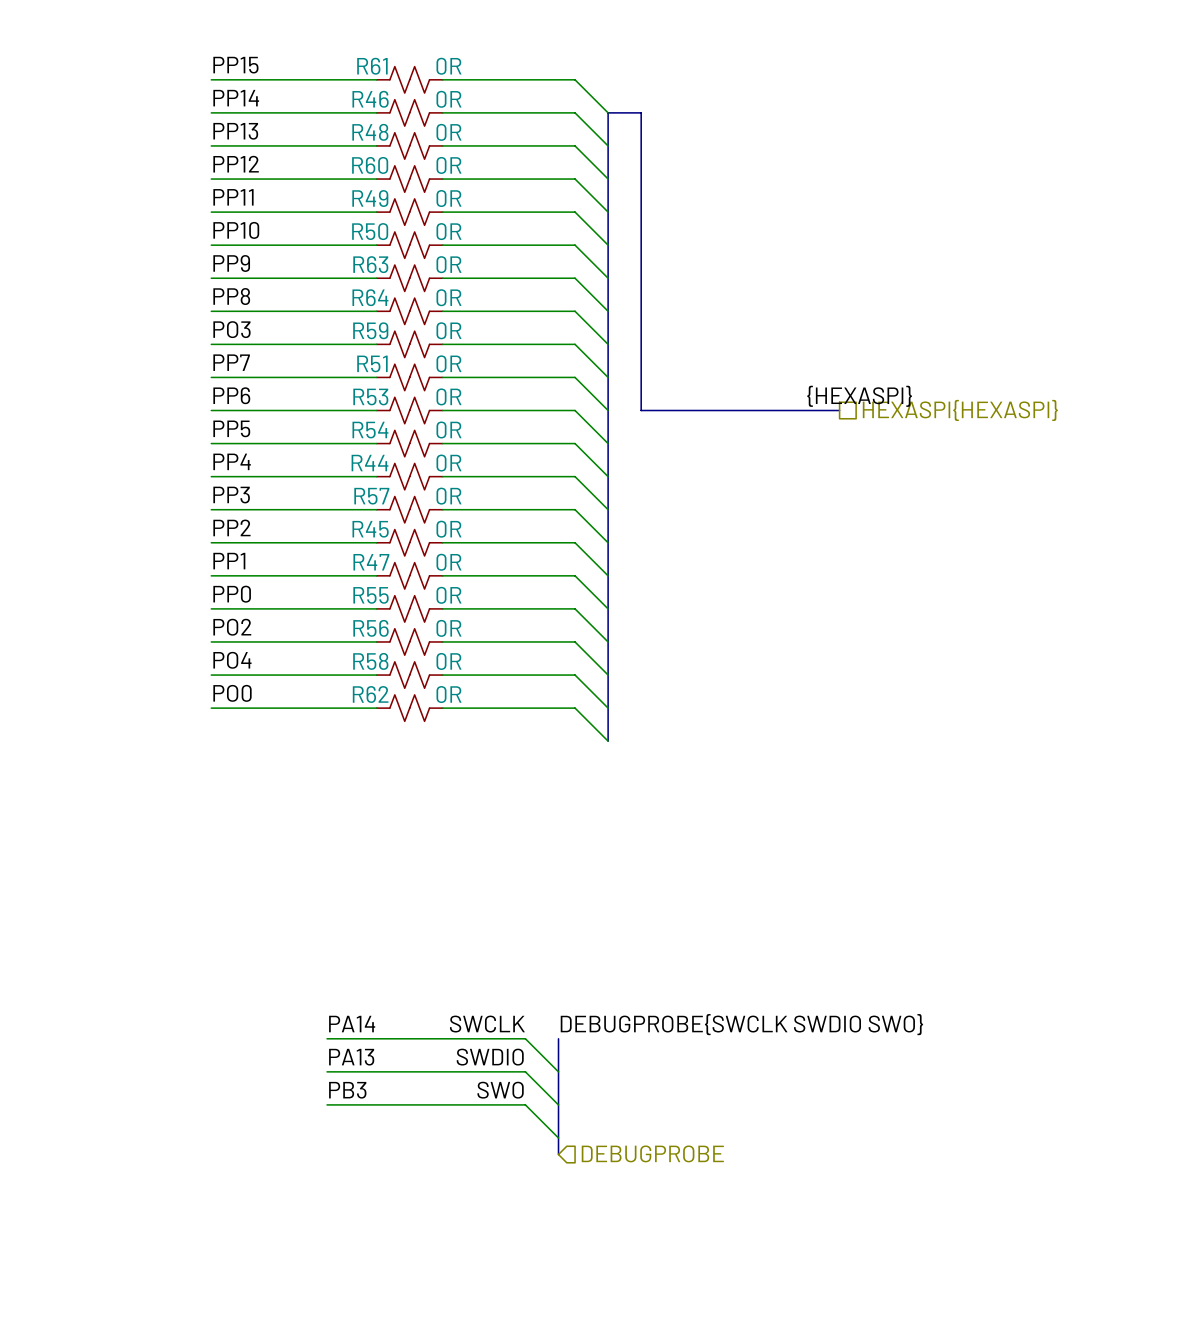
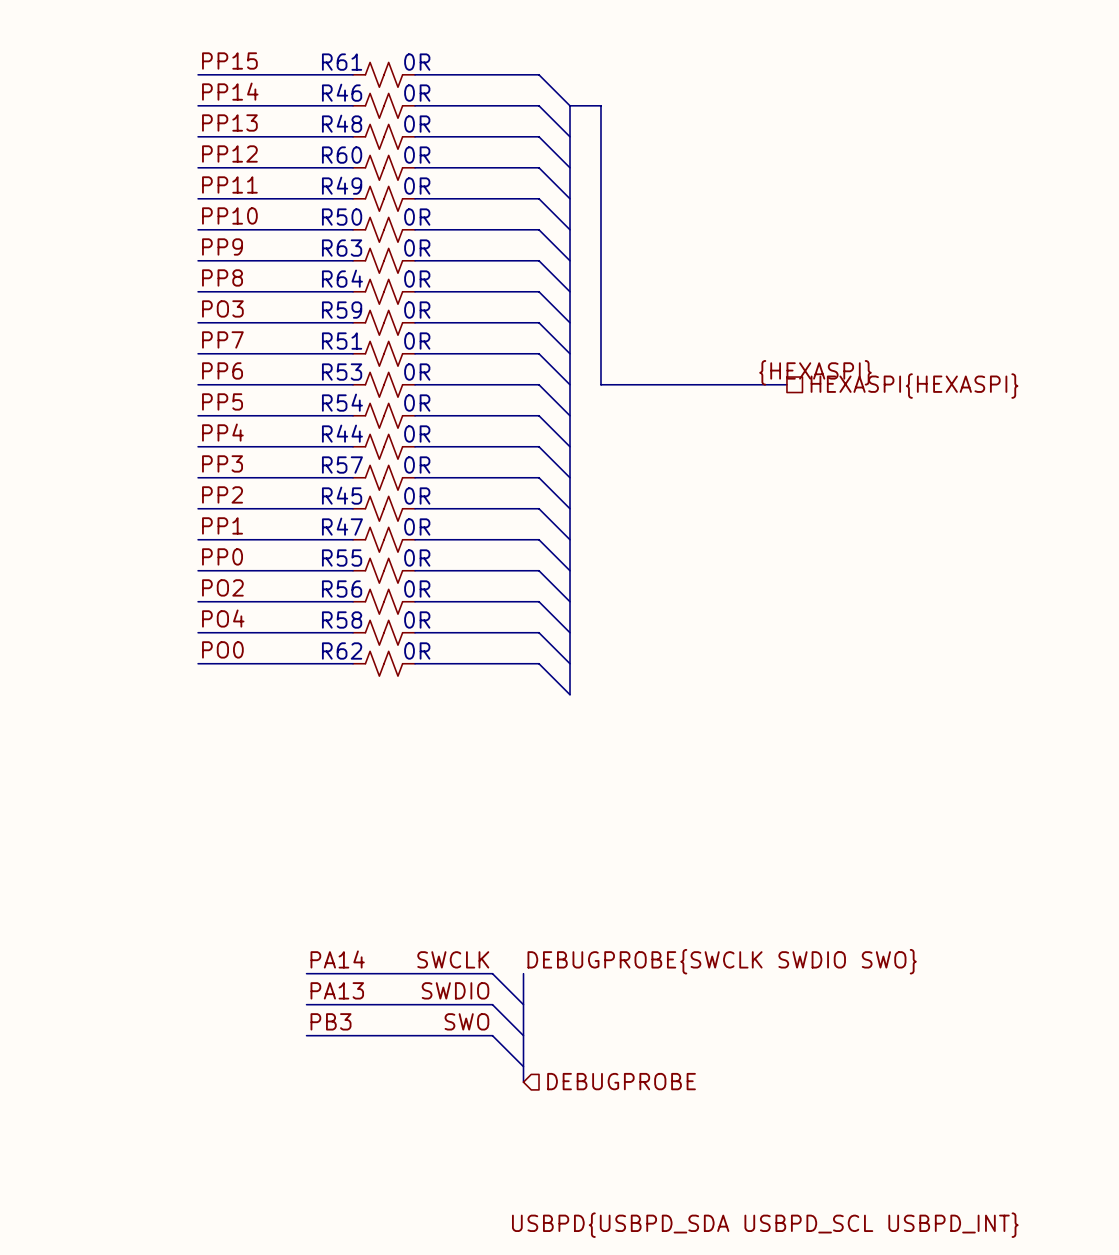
label: none -> USBPD{USBPD_SDA USBPD_SCL USBPD_INT} (765, 1225)

